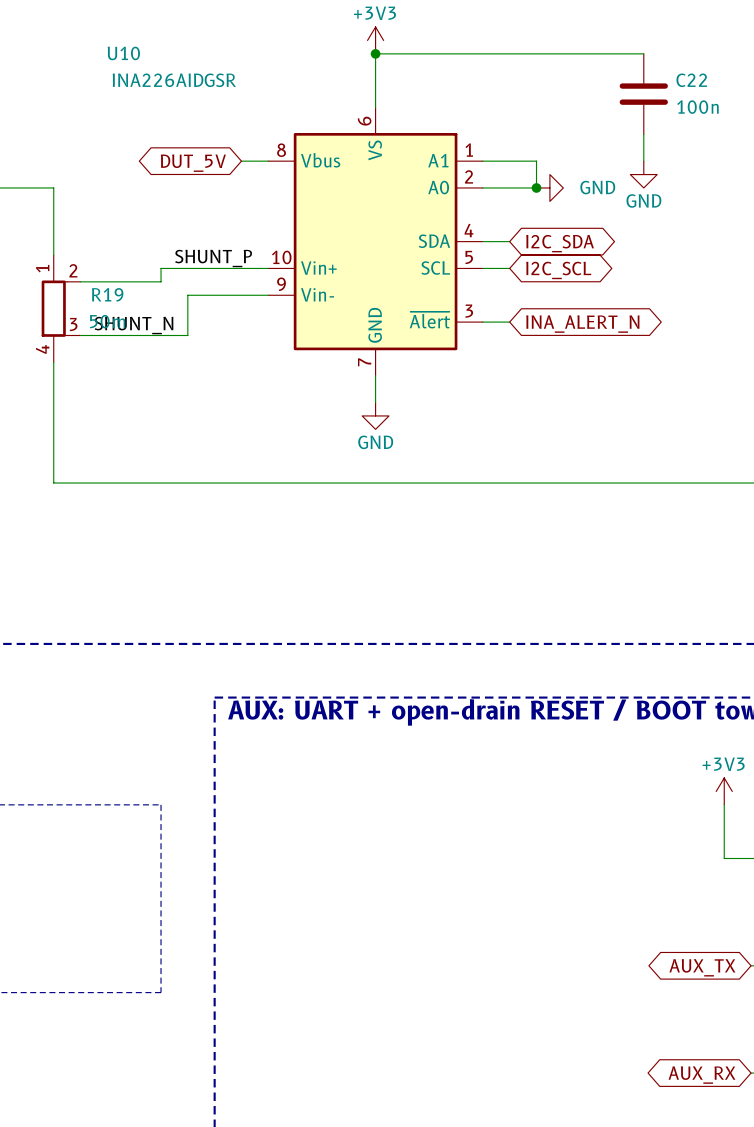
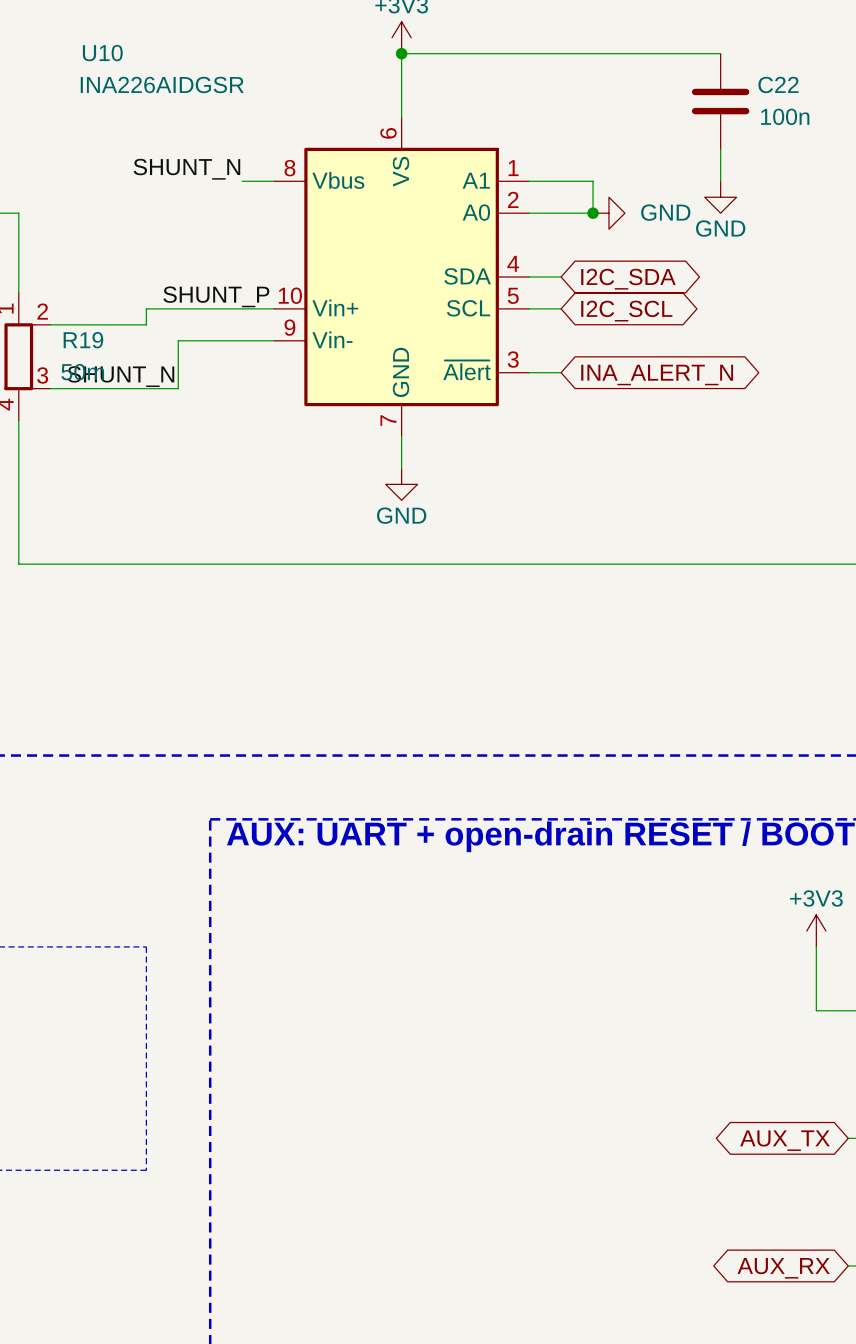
label: none -> SHUNT_N (186, 169)
global label: DUT_5V (193, 163) -> none

